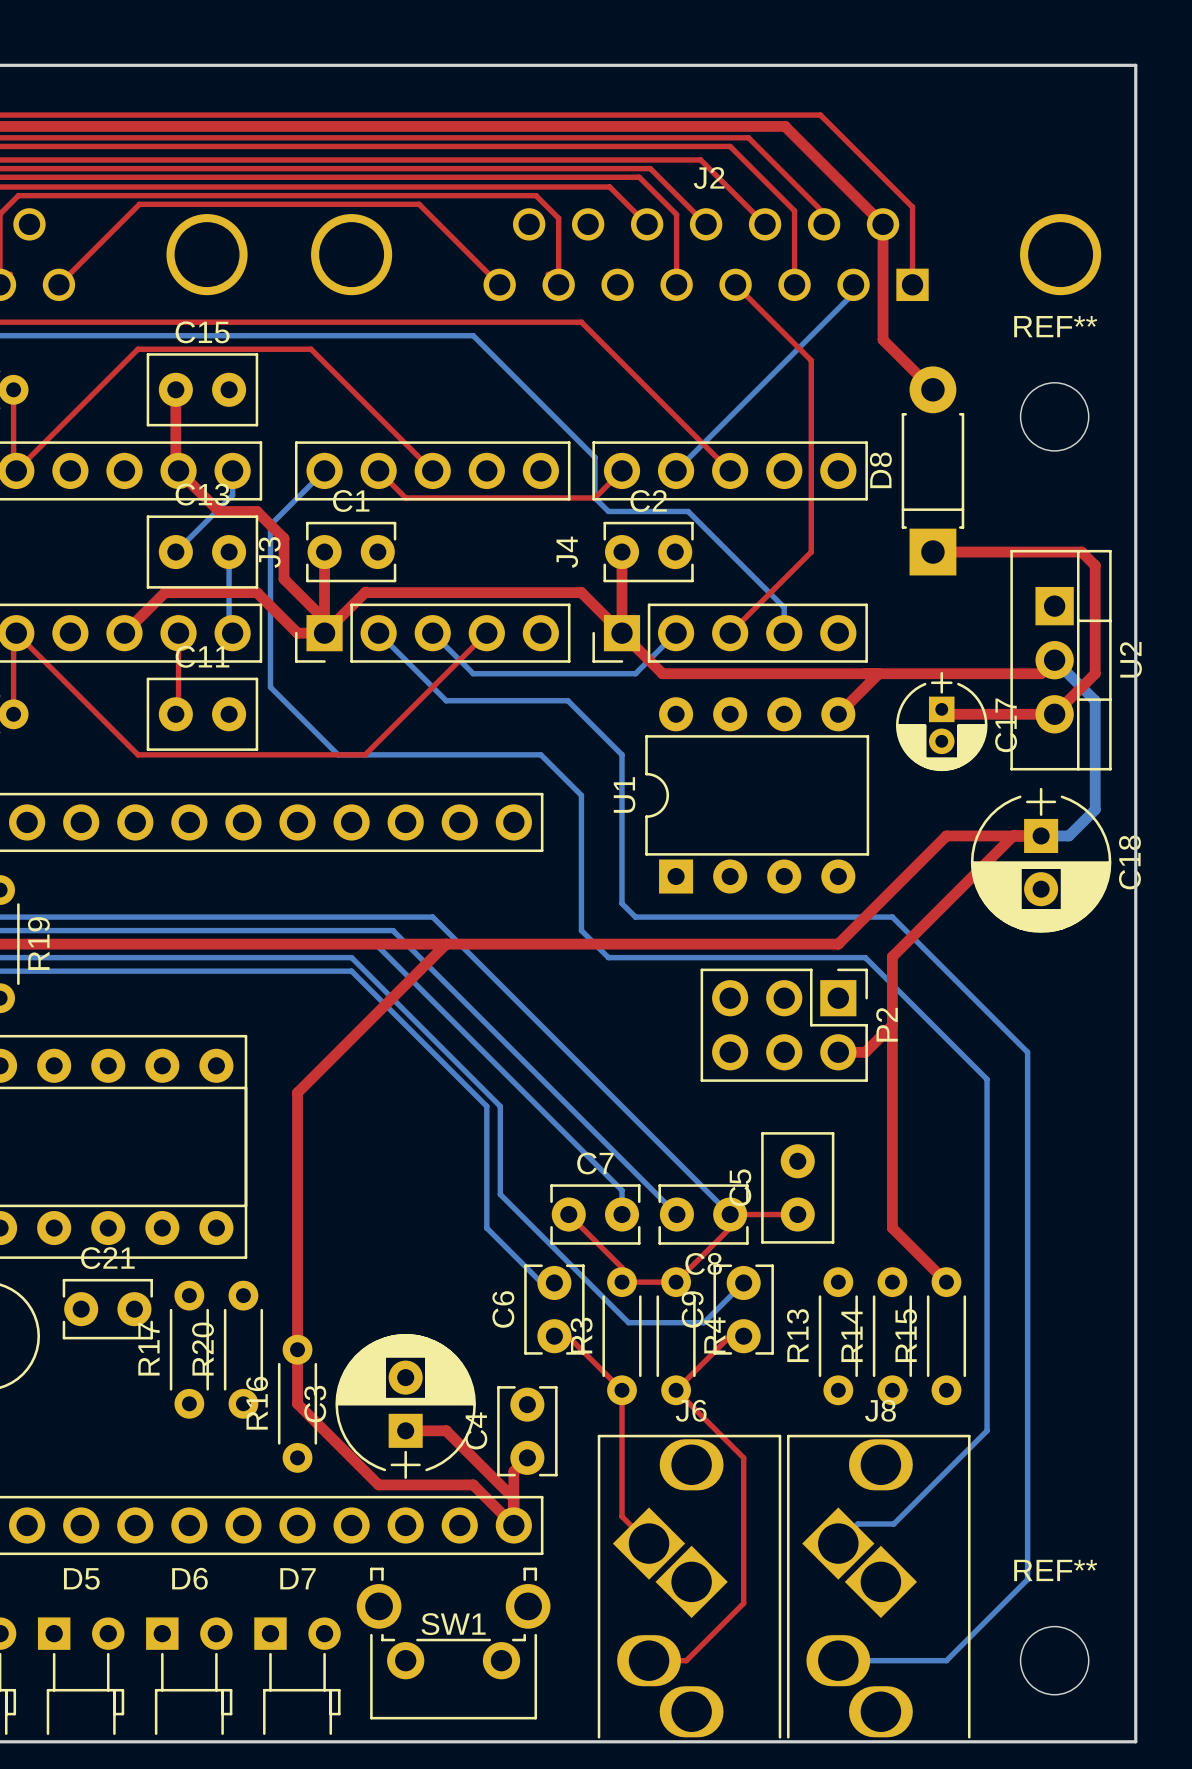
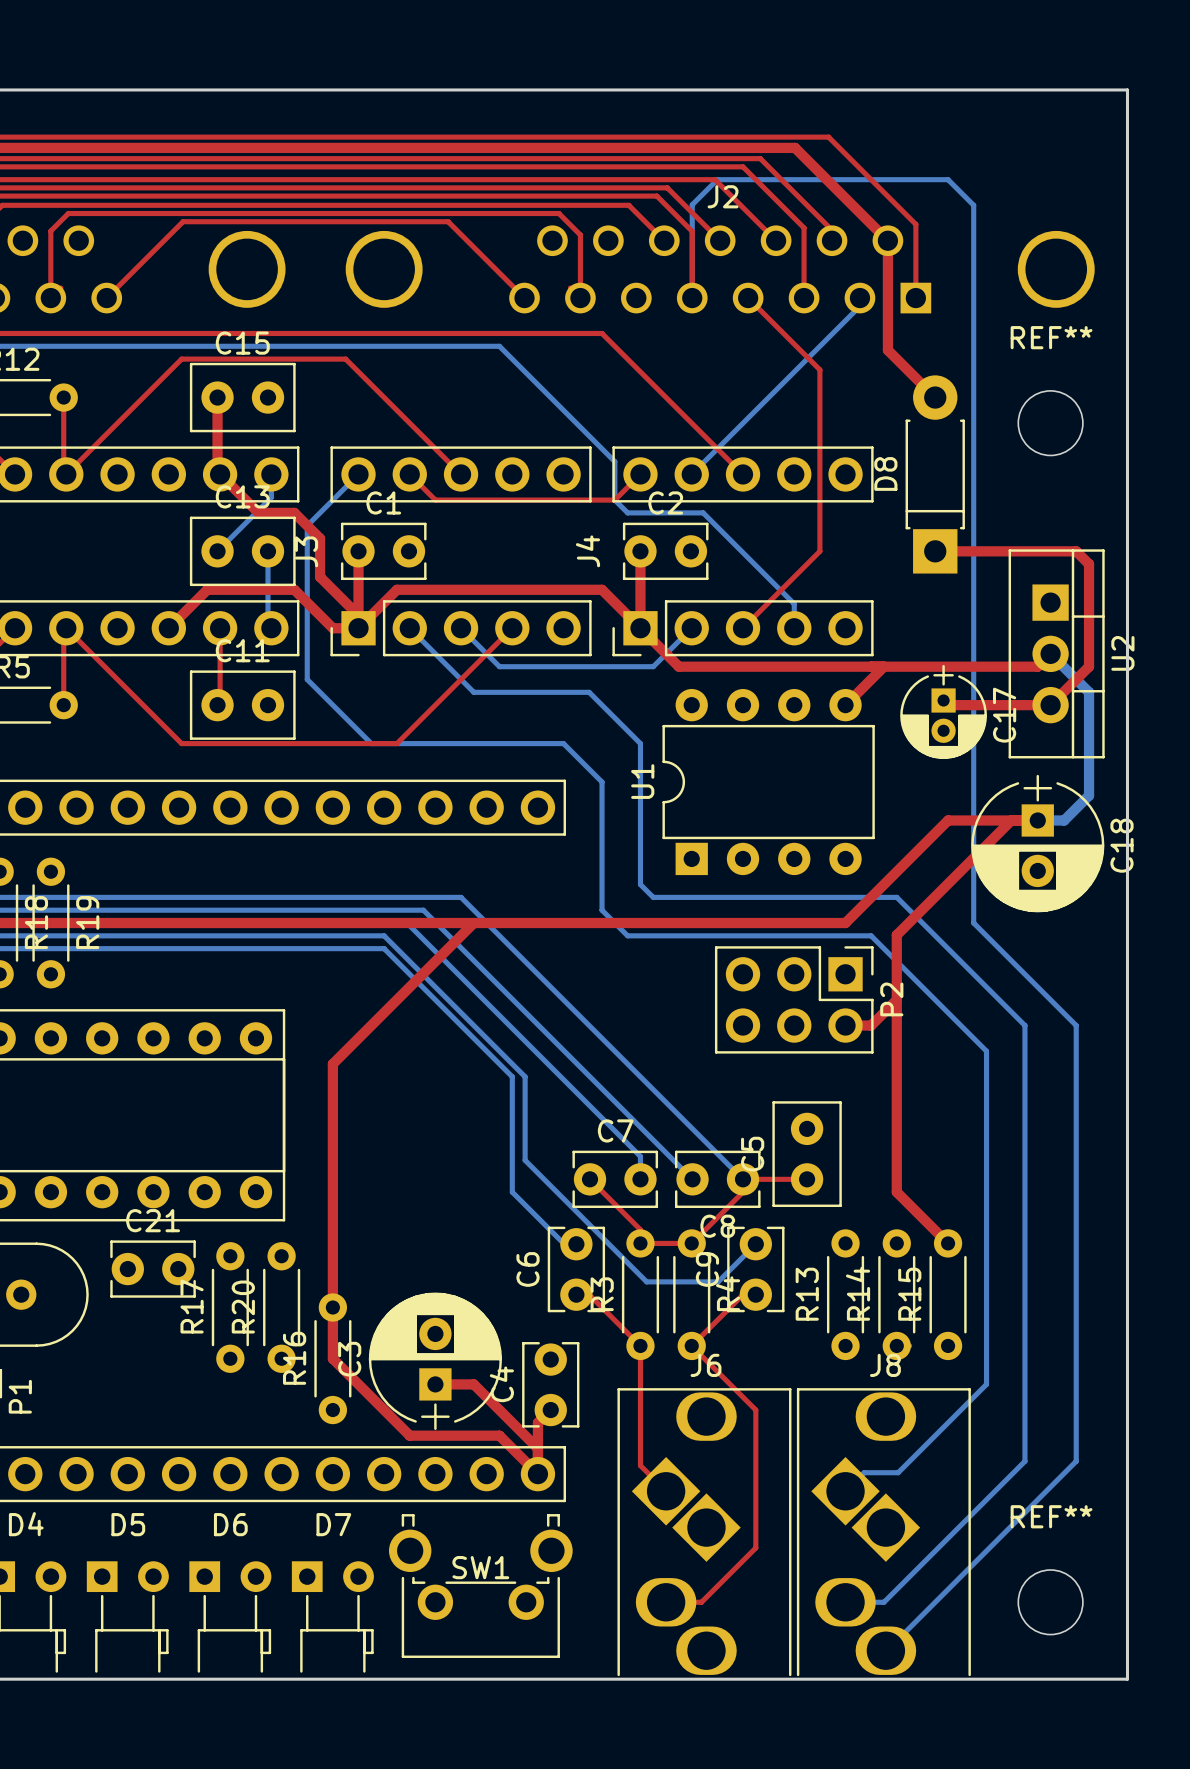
bottom track: none -> (692, 298) (692, 204) (717, 179) (948, 179) (973, 205) (973, 923) (1076, 1025) (1076, 1461) (885, 1650)
bottom track: (1027, 1511) (1027, 1579) (946, 1660) (878, 1660) -> (1024, 1461) (883, 1602)

